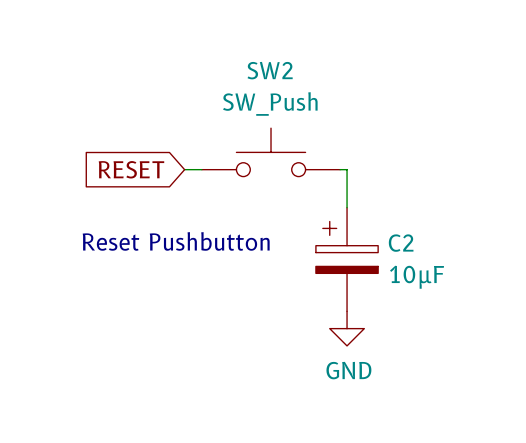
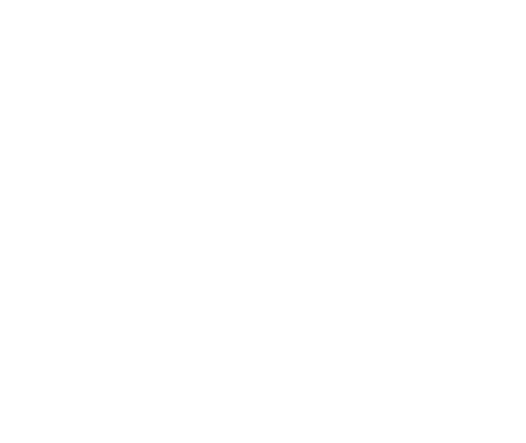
SW2: SW_Push (271, 152) -> none
global label: RESET (131, 169) -> none
wire: (184, 169) (201, 169) -> none
wire: (340, 169) (347, 169) (347, 207) -> none
text: Reset Pushbutton (176, 241) -> none
C2: 10µF (347, 259) -> none
power symbol: GND (347, 328) -> none

